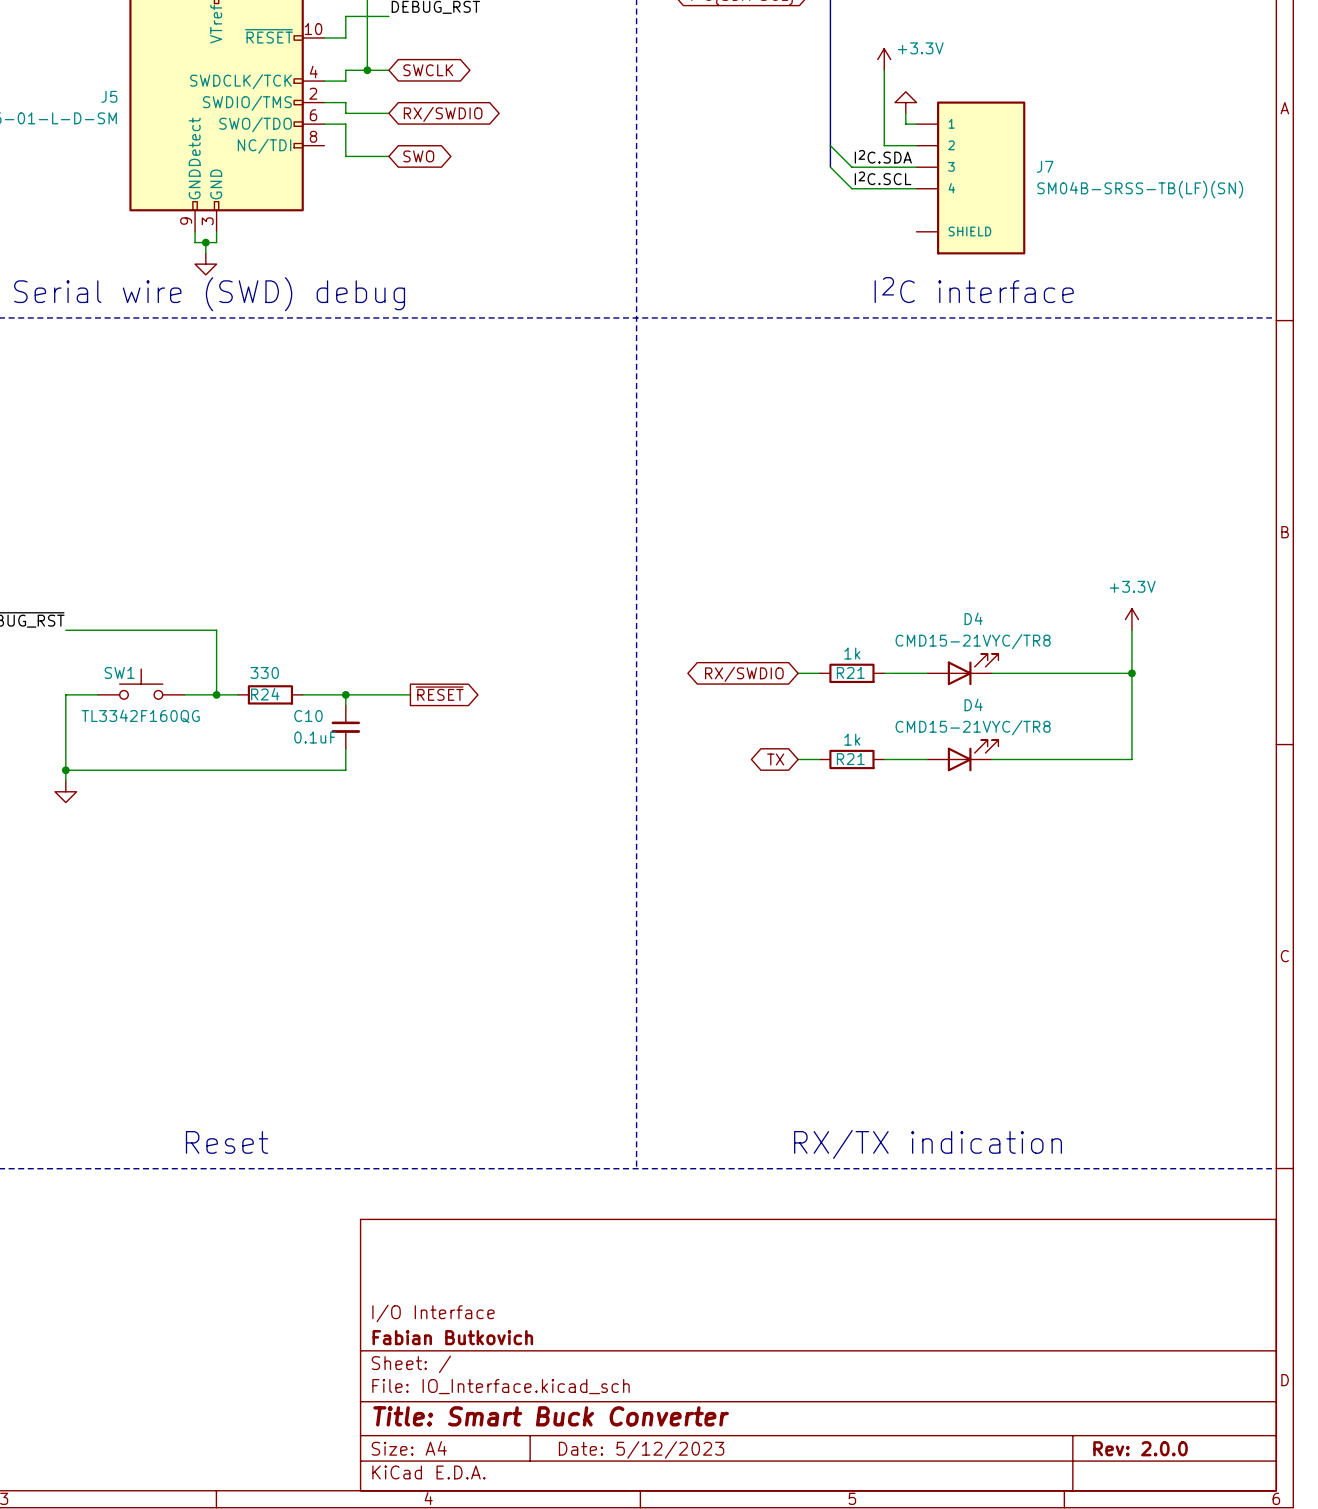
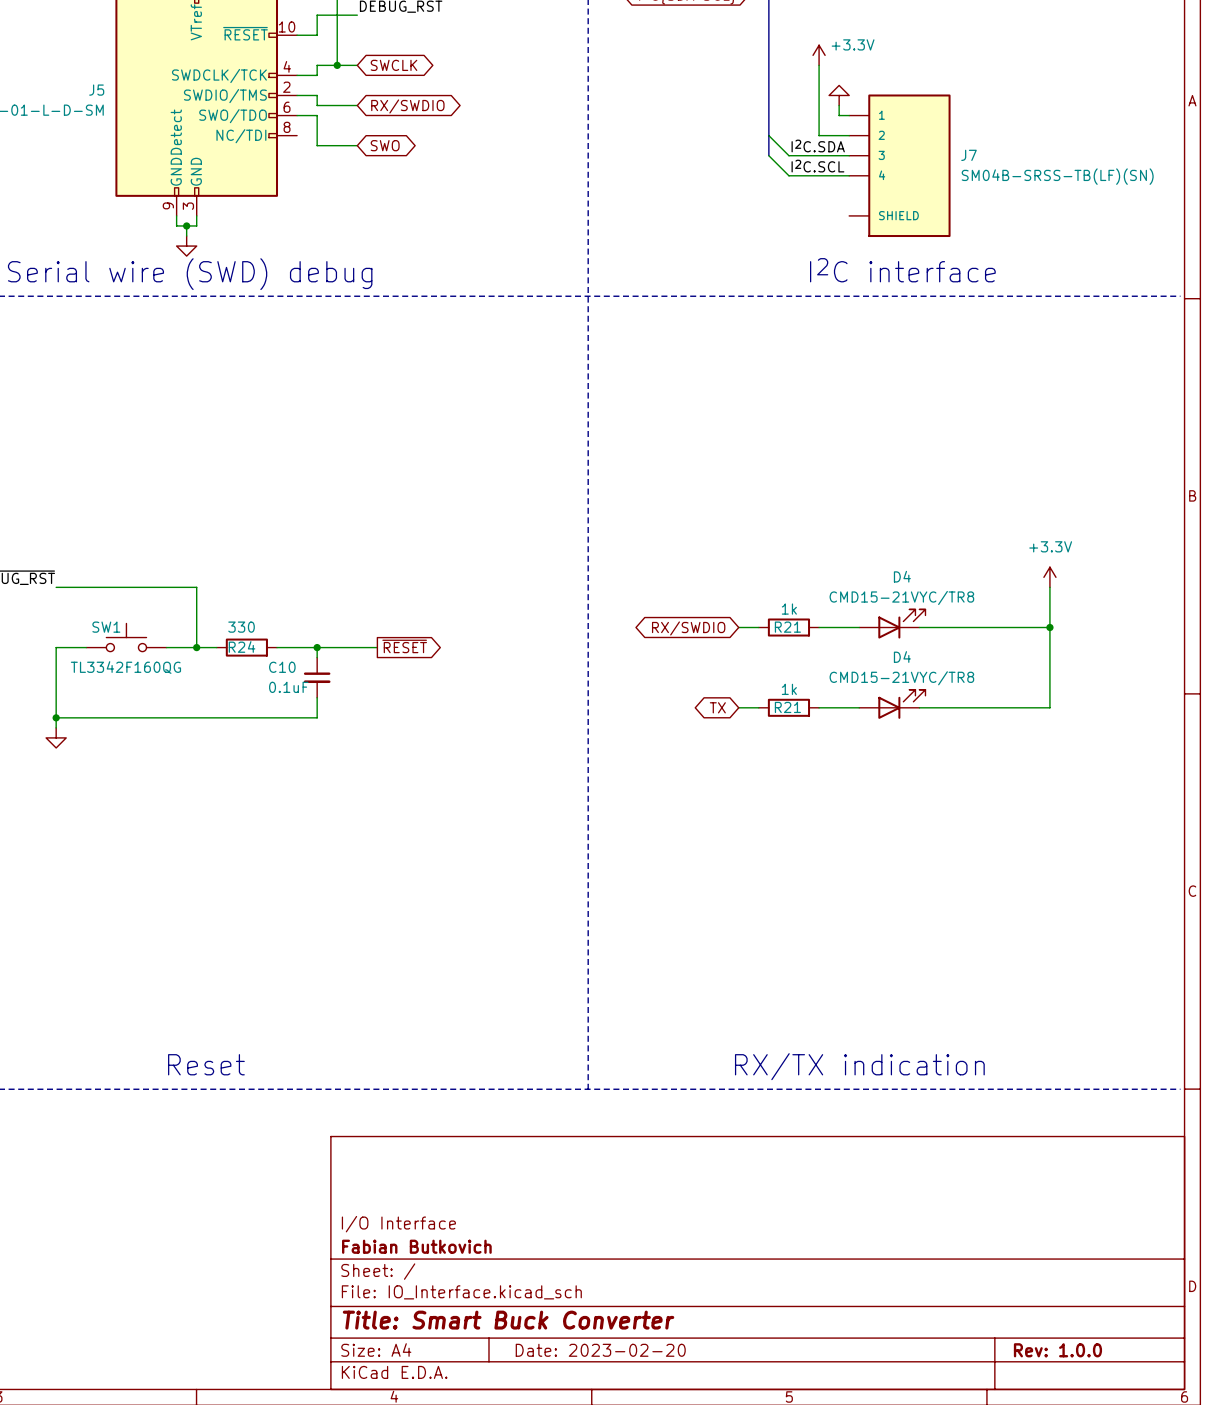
title block: Rev: 2.0.0 (1140, 1448) -> Rev: 1.0.0 (1057, 1350)
title block: Date: 5/12/2023 (641, 1449) -> Date: 2023-02-20 (600, 1350)

